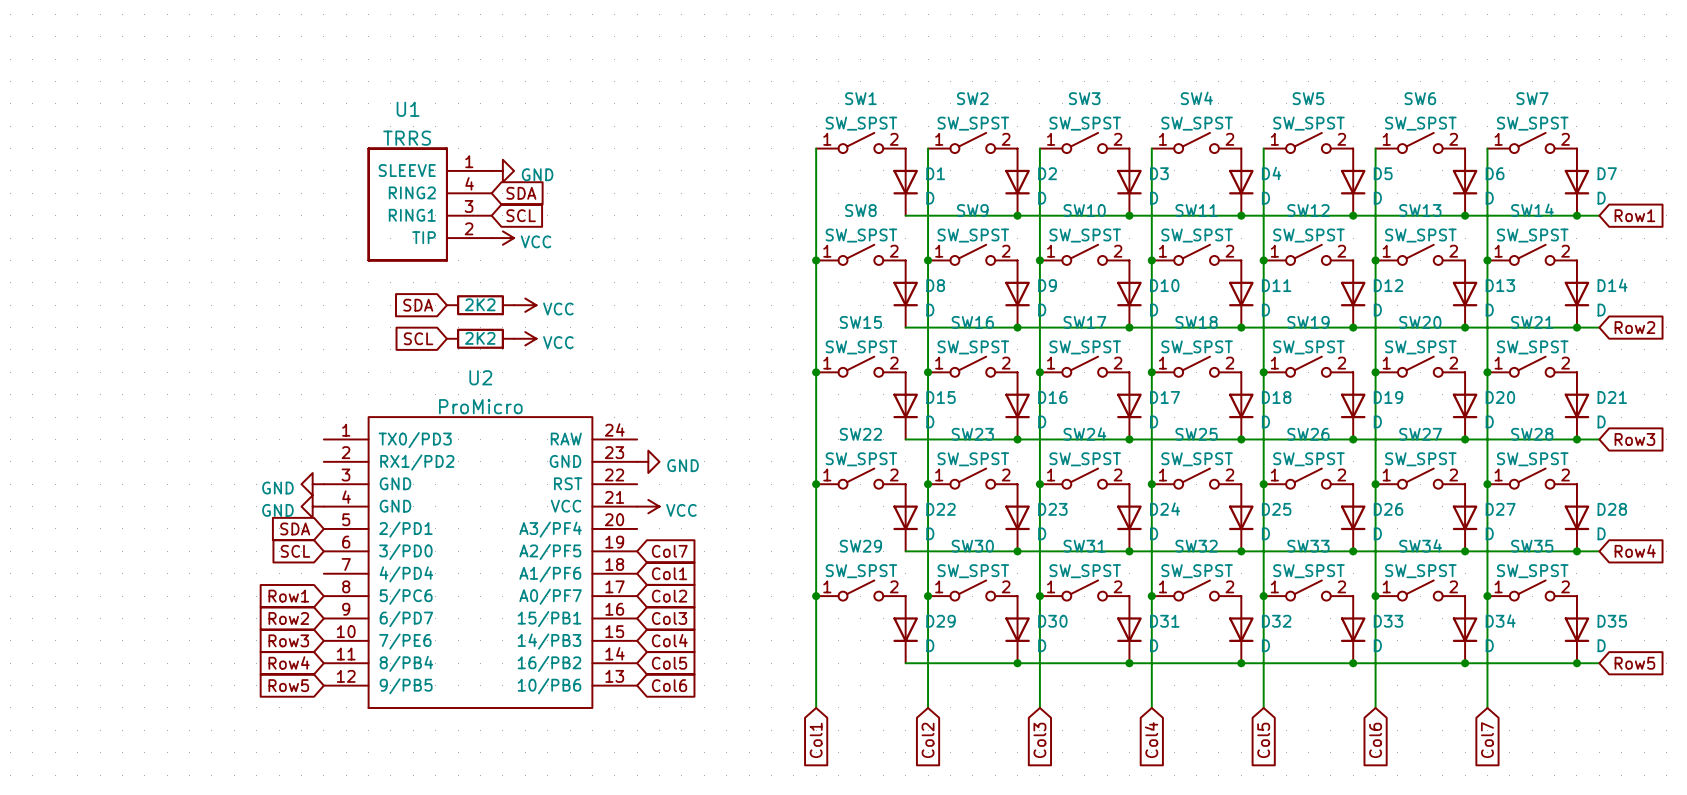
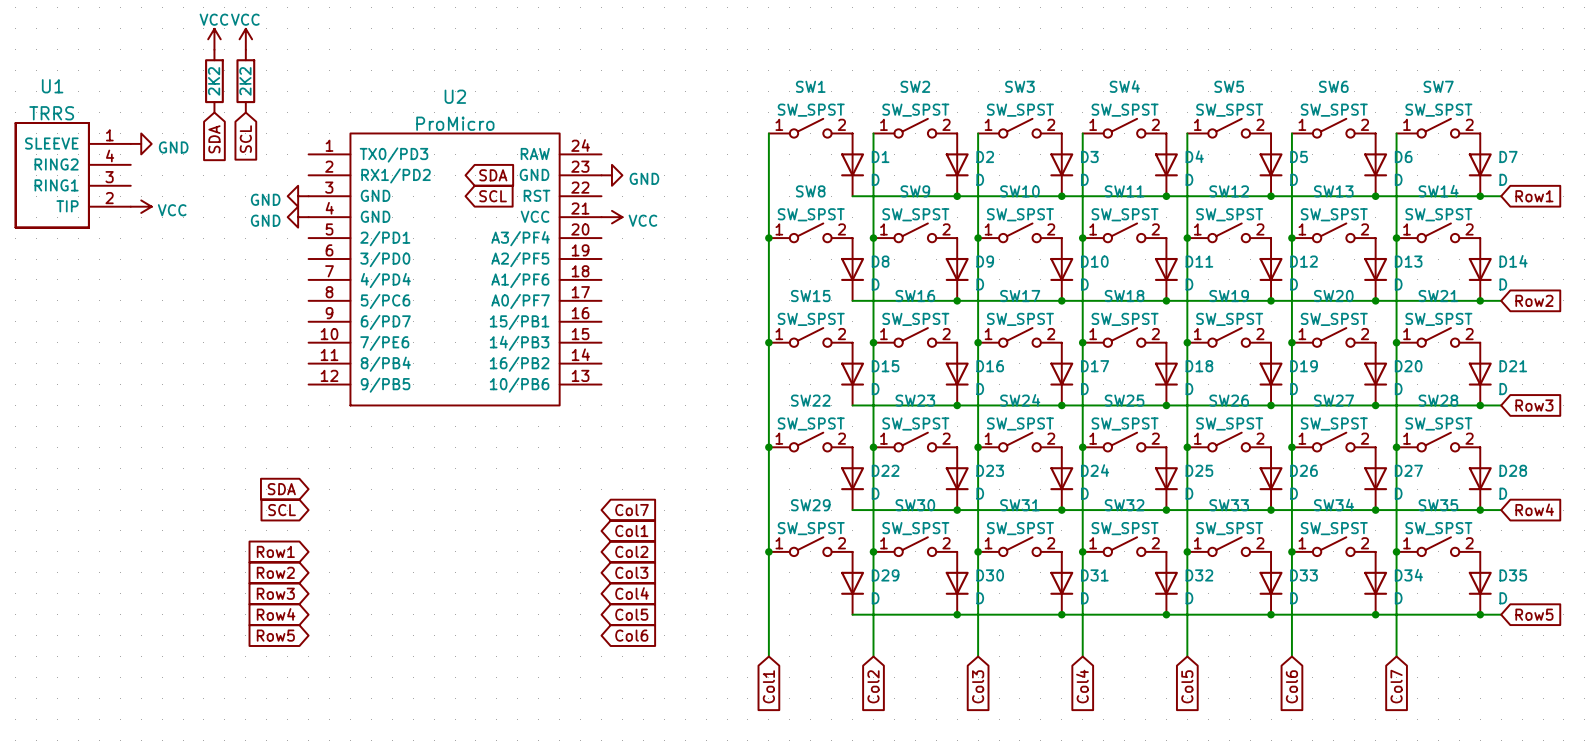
power symbol: none -> VCC (214, 39)
power symbol: none -> VCC (245, 39)
part: none -> 2K2 (214, 81)
part: none -> 2K2 (245, 81)
global label: none -> SDA (214, 139)
global label: none -> SCL (245, 139)
power symbol: none -> GND (141, 143)
power symbol: GND (502, 170) -> none
power symbol: none -> GND (611, 175)
U1 position: (430, 204) -> (73, 175)
power symbol: none -> GND (298, 196)
power symbol: none -> VCC (141, 206)
power symbol: none -> GND (298, 217)
power symbol: VCC (502, 238) -> none
power symbol: none -> VCC (611, 217)
global label: SDA (418, 305) -> none
part: 2K2 (480, 305) -> none
power symbol: VCC (525, 305) -> none
global label: SCL (418, 338) -> none
part: 2K2 (480, 338) -> none
power symbol: VCC (525, 338) -> none
power symbol: GND (648, 461) -> none
power symbol: GND (312, 484) -> none
power symbol: GND (312, 506) -> none
power symbol: VCC (648, 506) -> none
U2 position: (480, 562) -> (455, 269)

